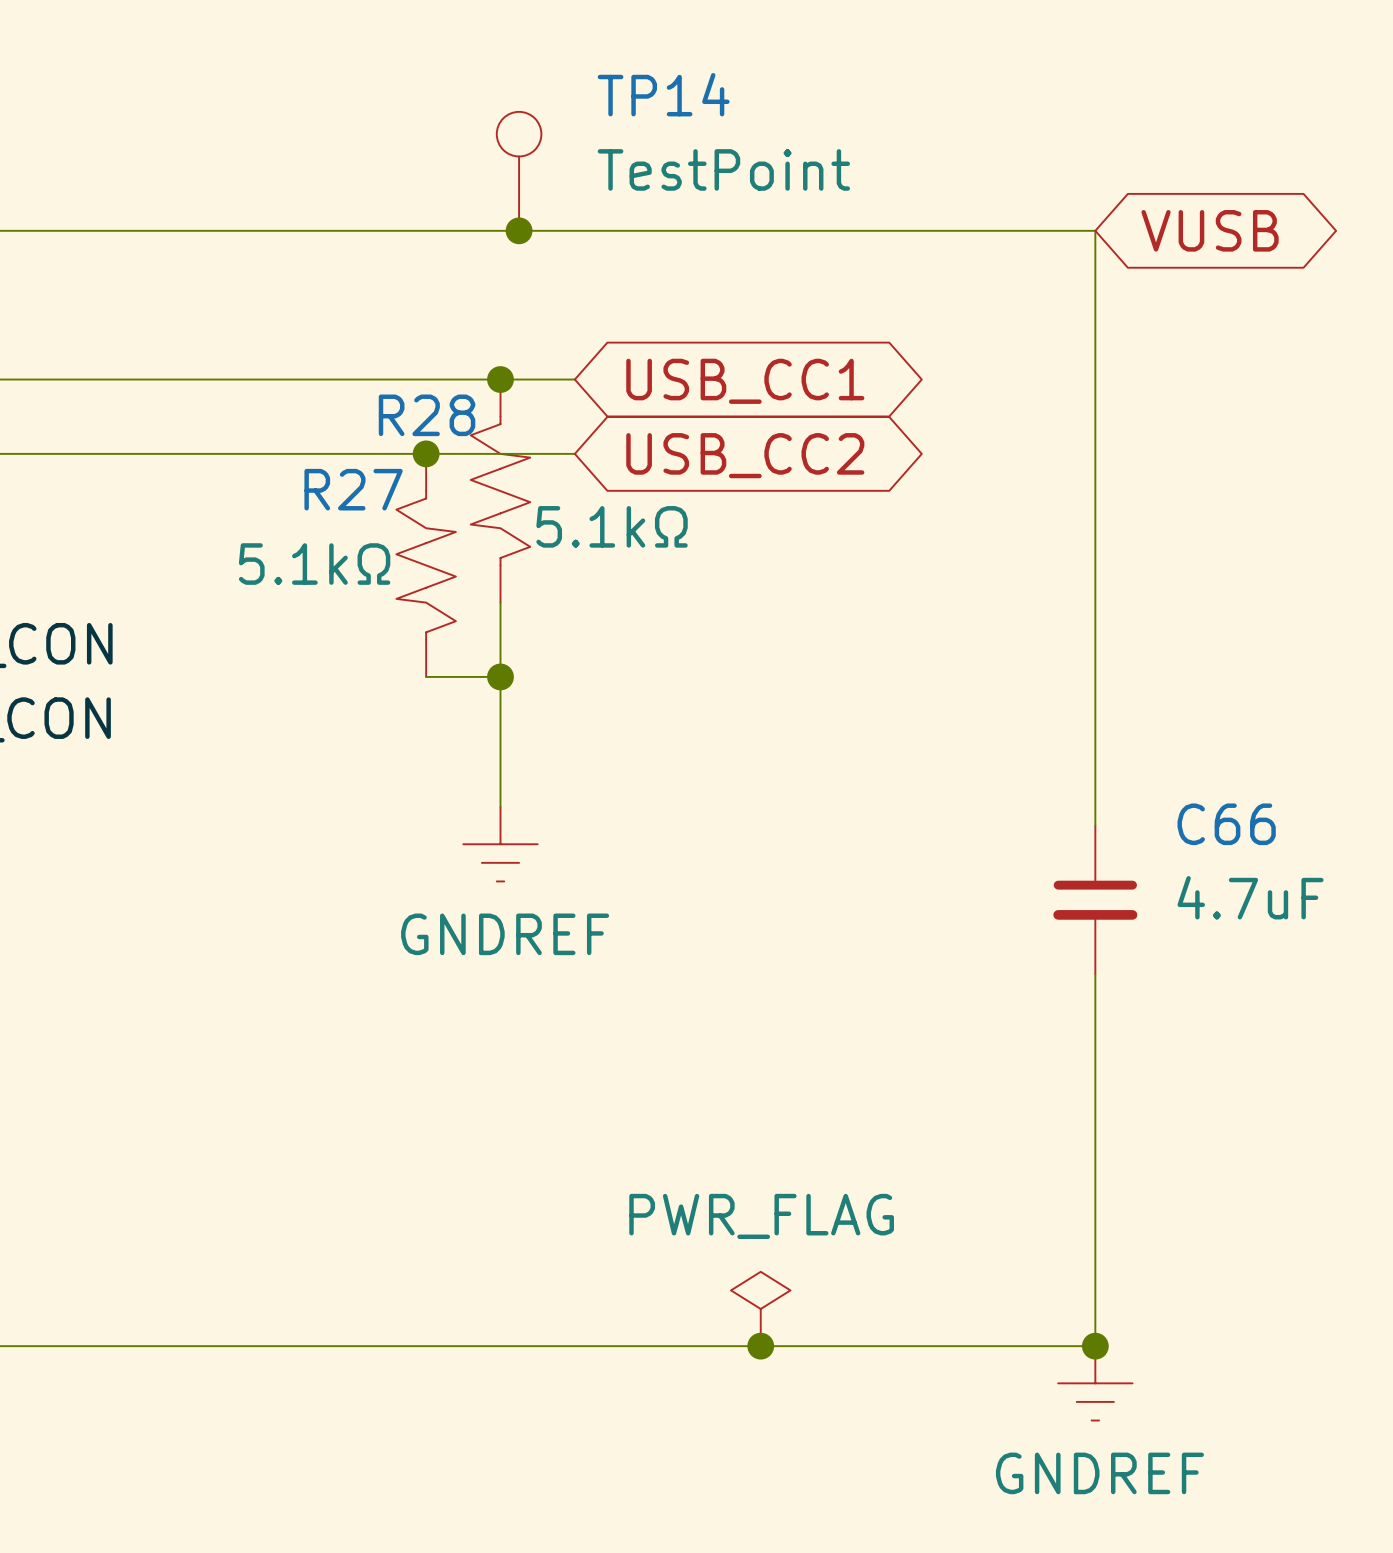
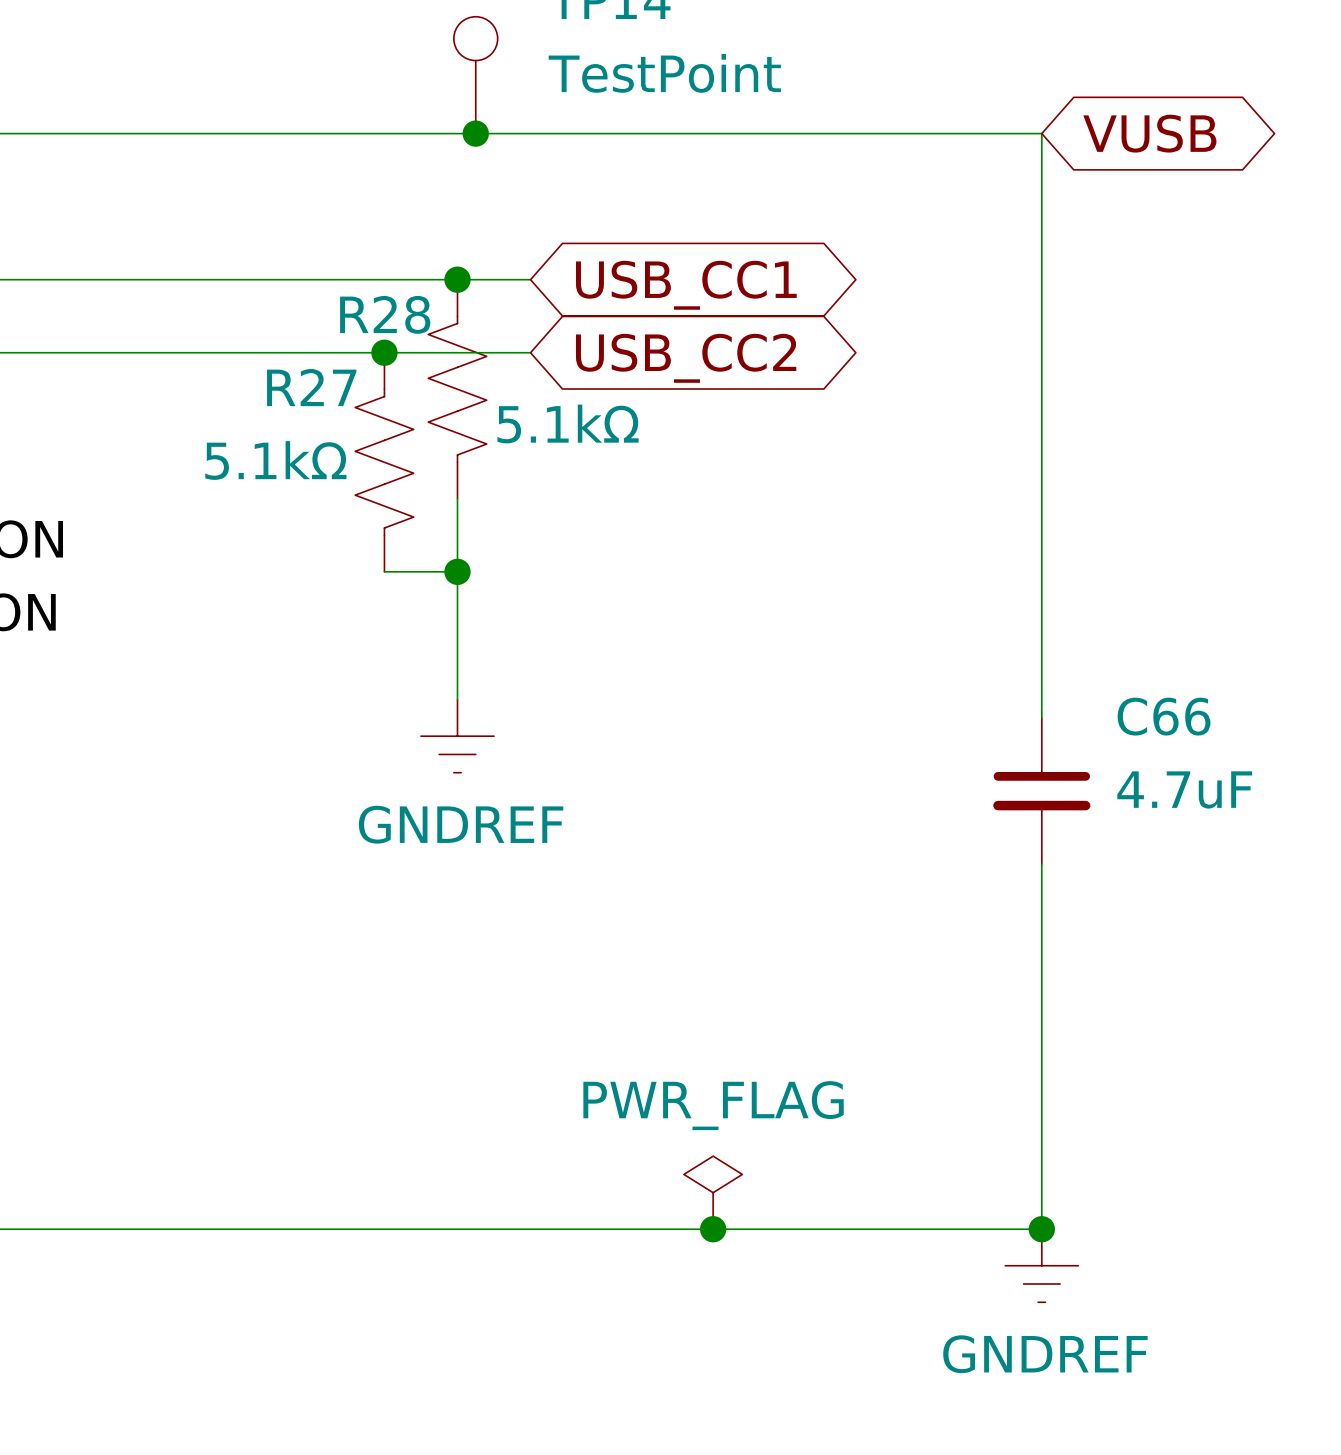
R28 symbol: [470, 379, 531, 603] -> [428, 279, 487, 499]
R27 symbol: [396, 453, 456, 677] -> [355, 352, 414, 572]
C66 symbol: [1053, 825, 1138, 975] -> [993, 717, 1091, 865]

